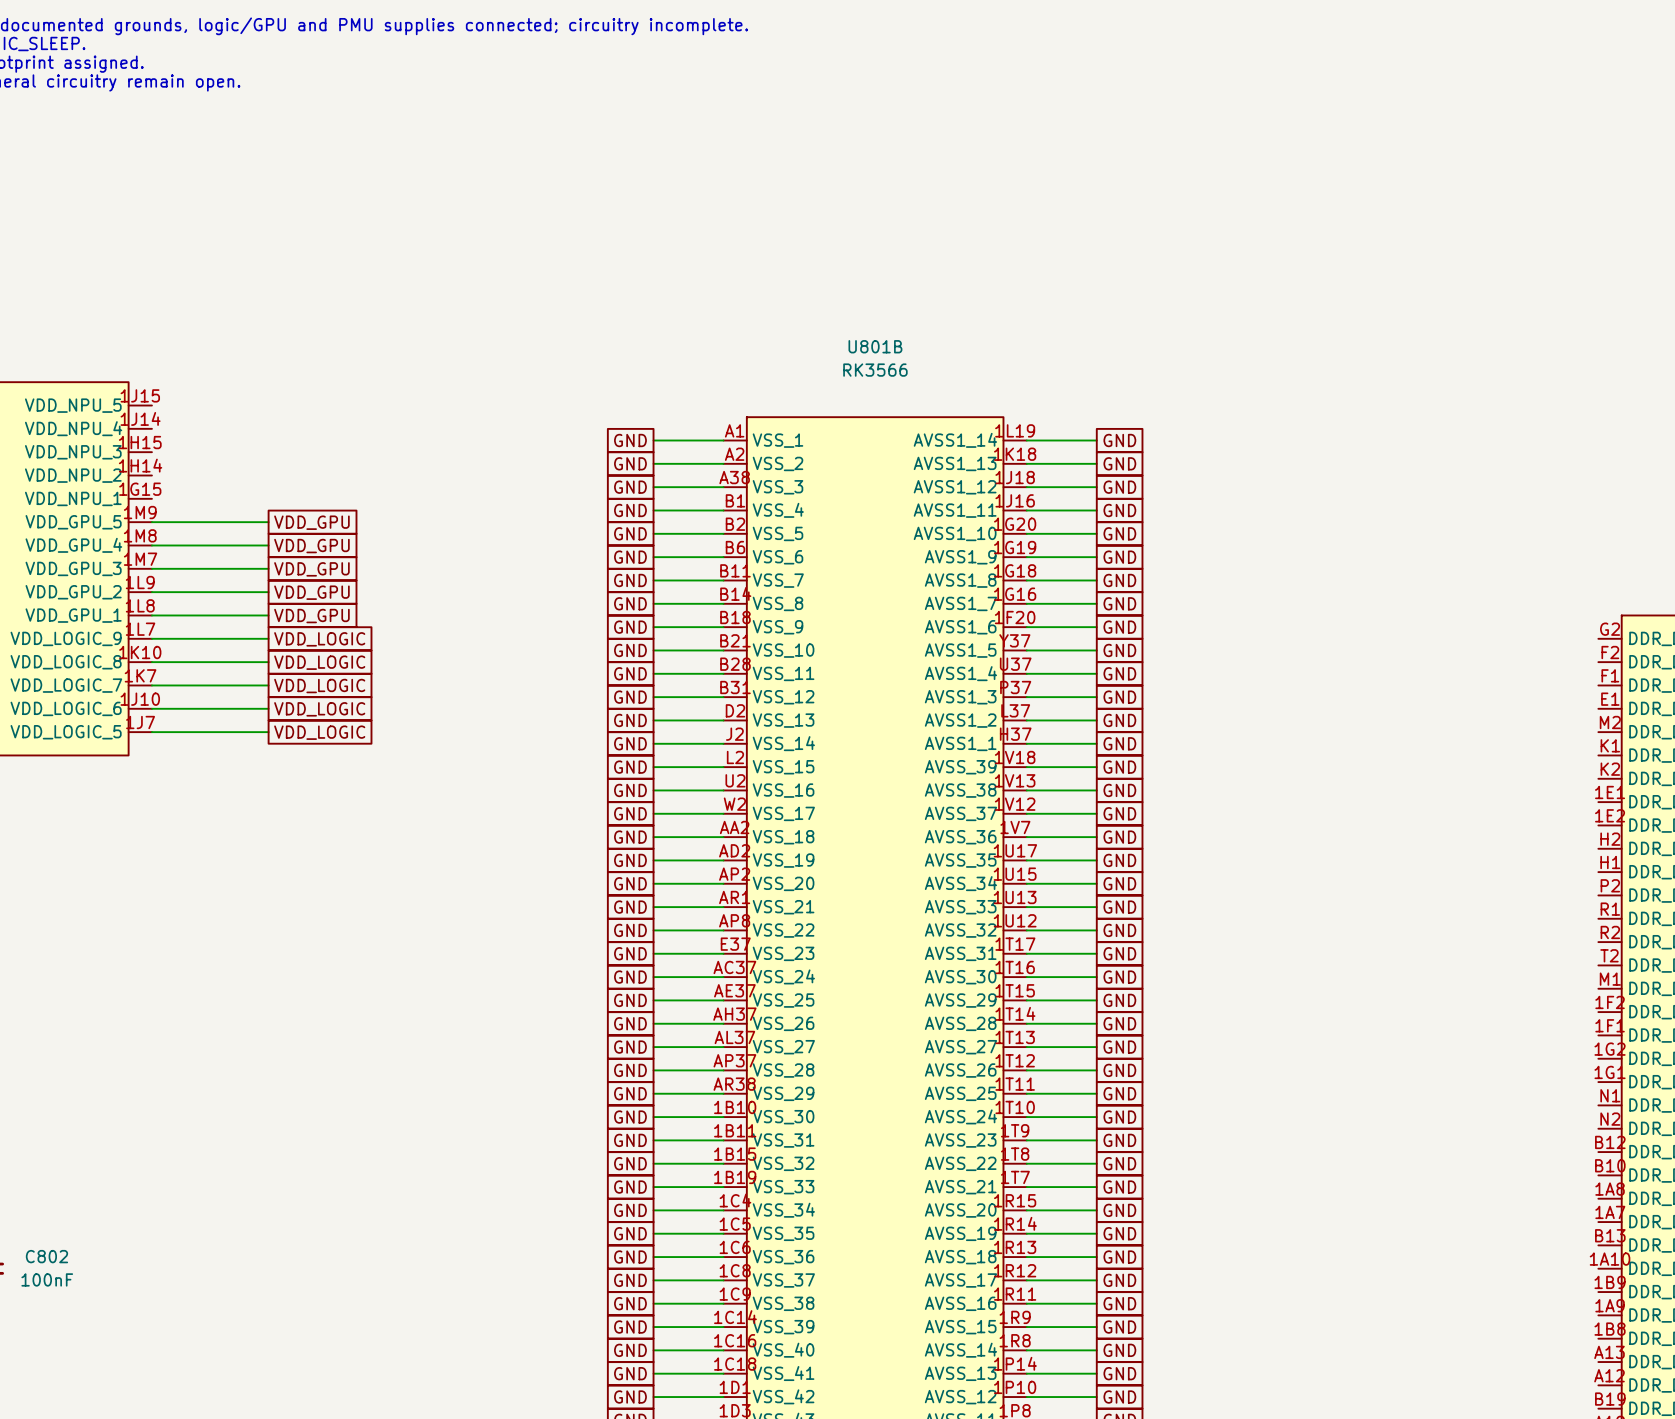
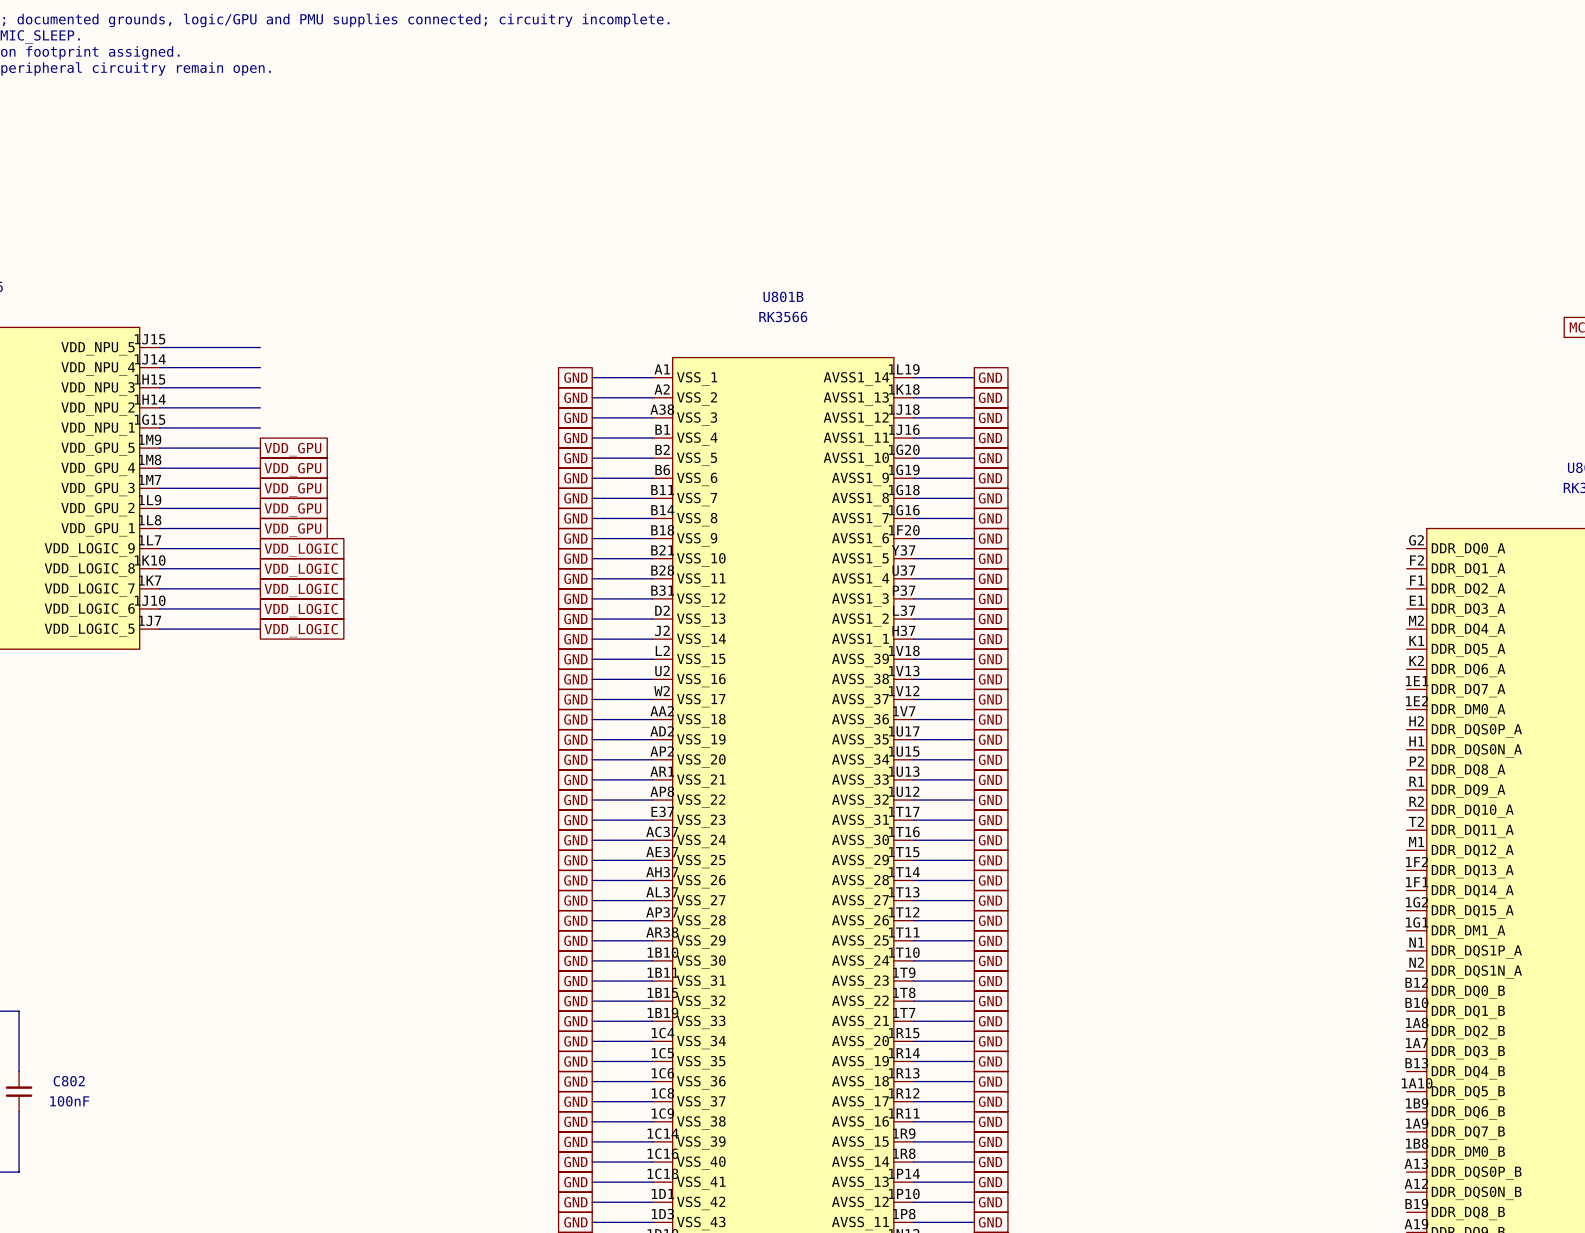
wire: none -> (159, 347) (260, 347)
wire: none -> (159, 367) (260, 367)
wire: none -> (159, 387) (260, 387)
wire: none -> (159, 407) (260, 407)
wire: none -> (159, 427) (260, 427)

